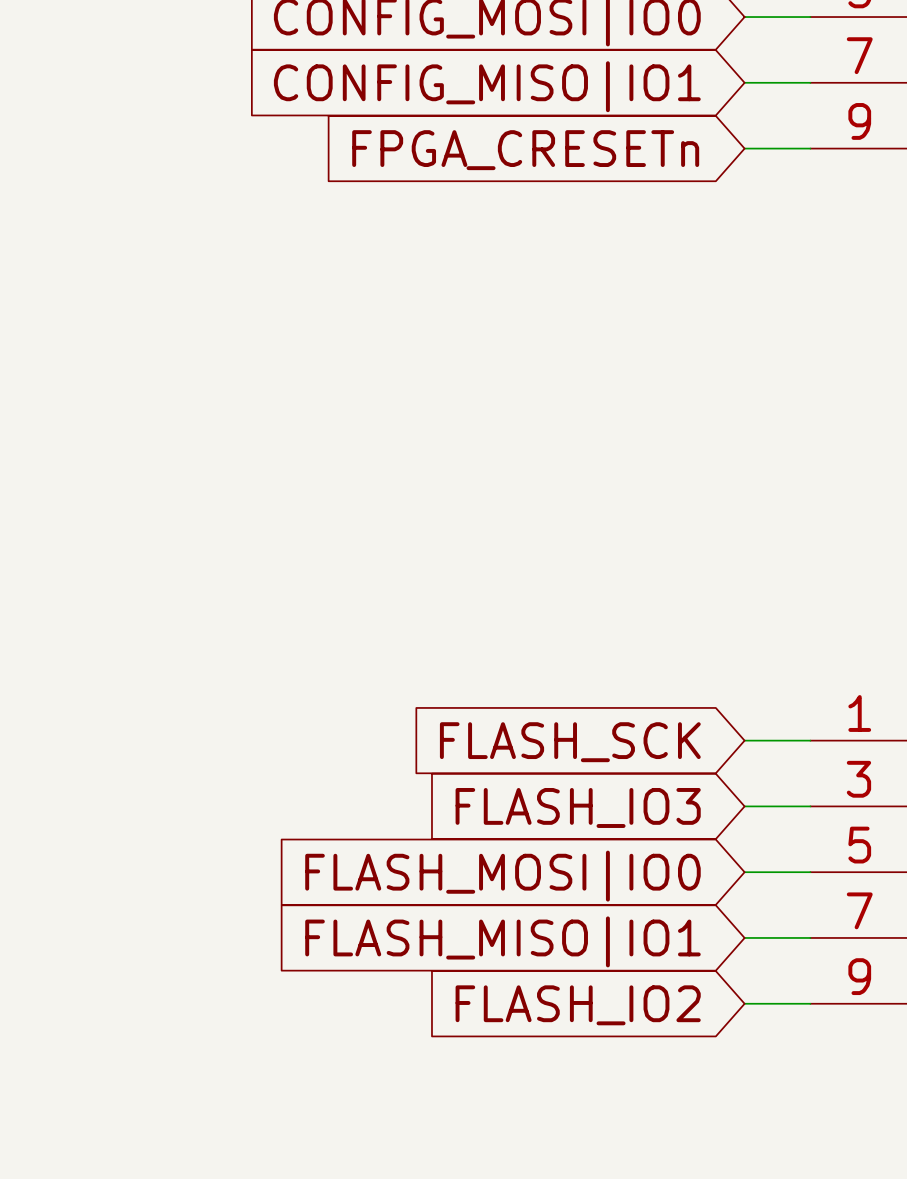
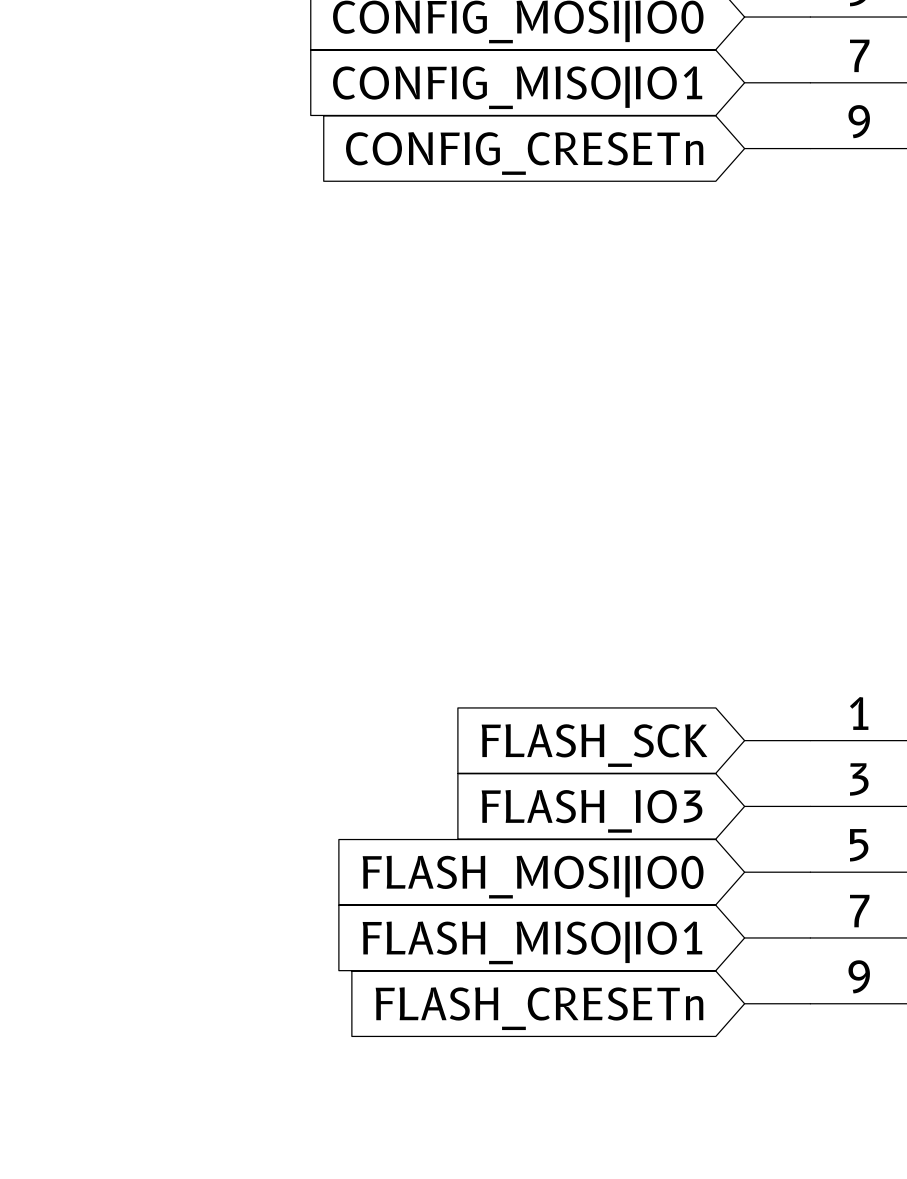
global label: FPGA_CRESETn (525, 150) -> CONFIG_CRESETn (524, 153)
global label: FLASH_IO2 (578, 1005) -> FLASH_CRESETn (539, 1008)

